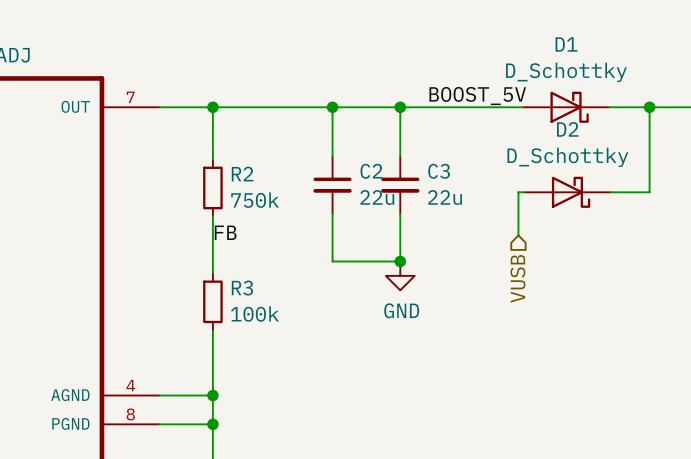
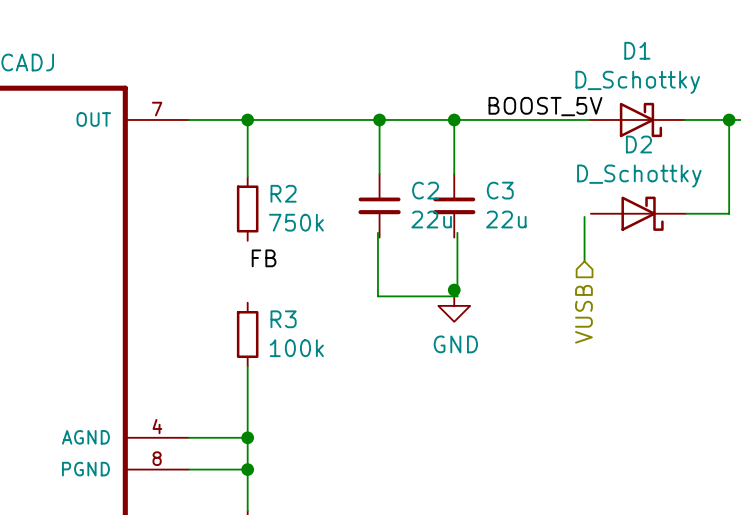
wire: (524, 192) (518, 192) (518, 195) -> none
wire: none -> (377, 232) (377, 296) (457, 296) (457, 232)
wire: (332, 213) (332, 261) (400, 261) (400, 213) -> none
wire: (212, 216) (212, 273) -> none

